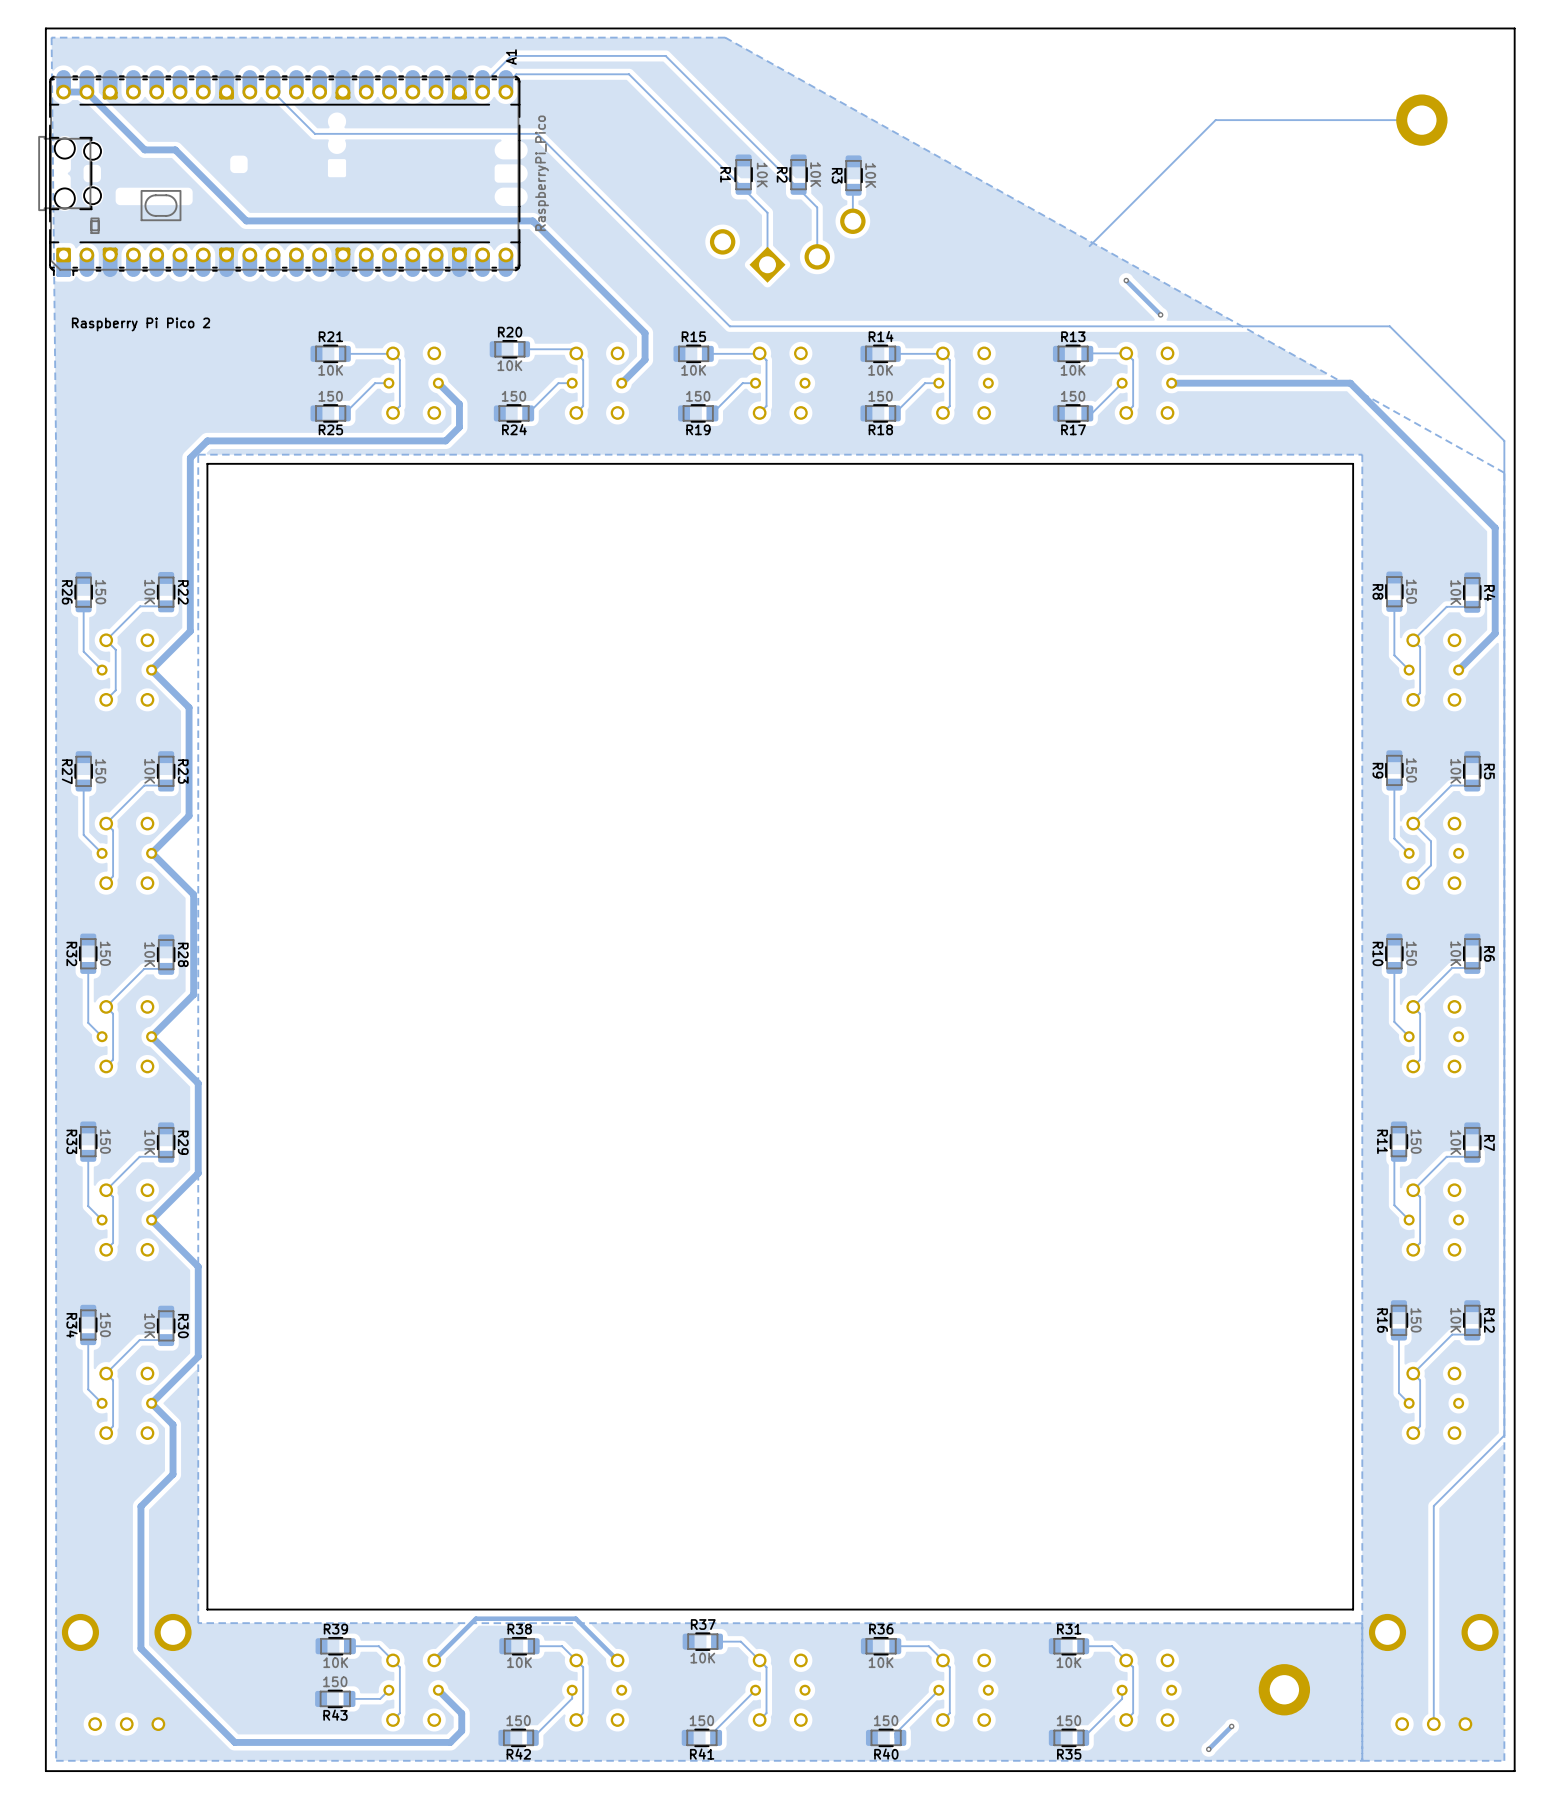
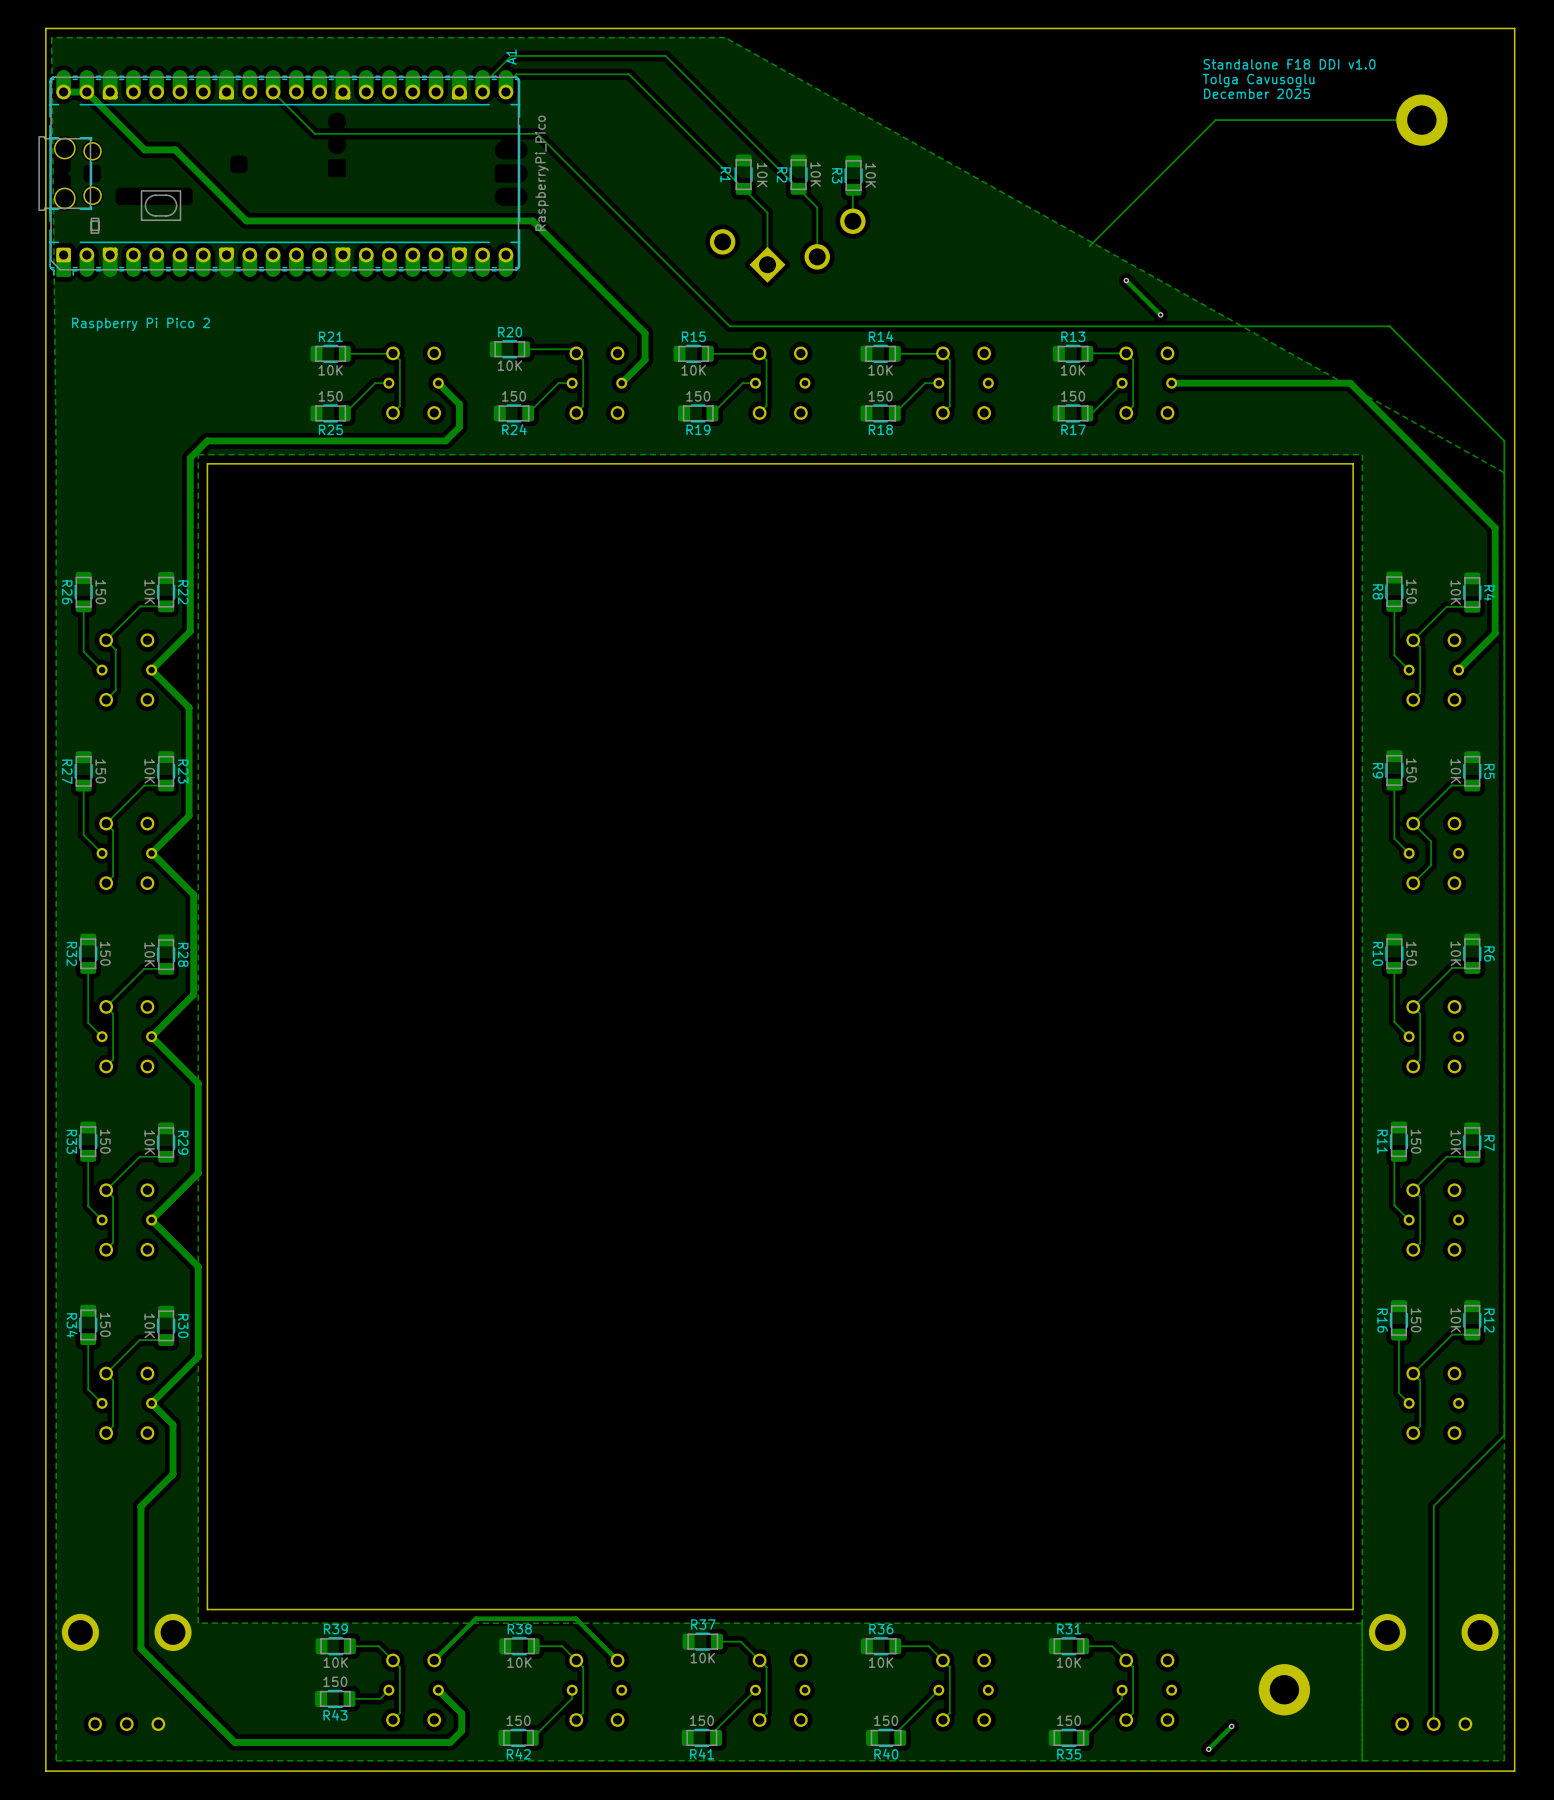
text: none -> Standalone F18 DDI v1.0 (1289, 64)
text: none -> Tolga Cavusoglu (1258, 80)
text: none -> December 2025 (1257, 93)

